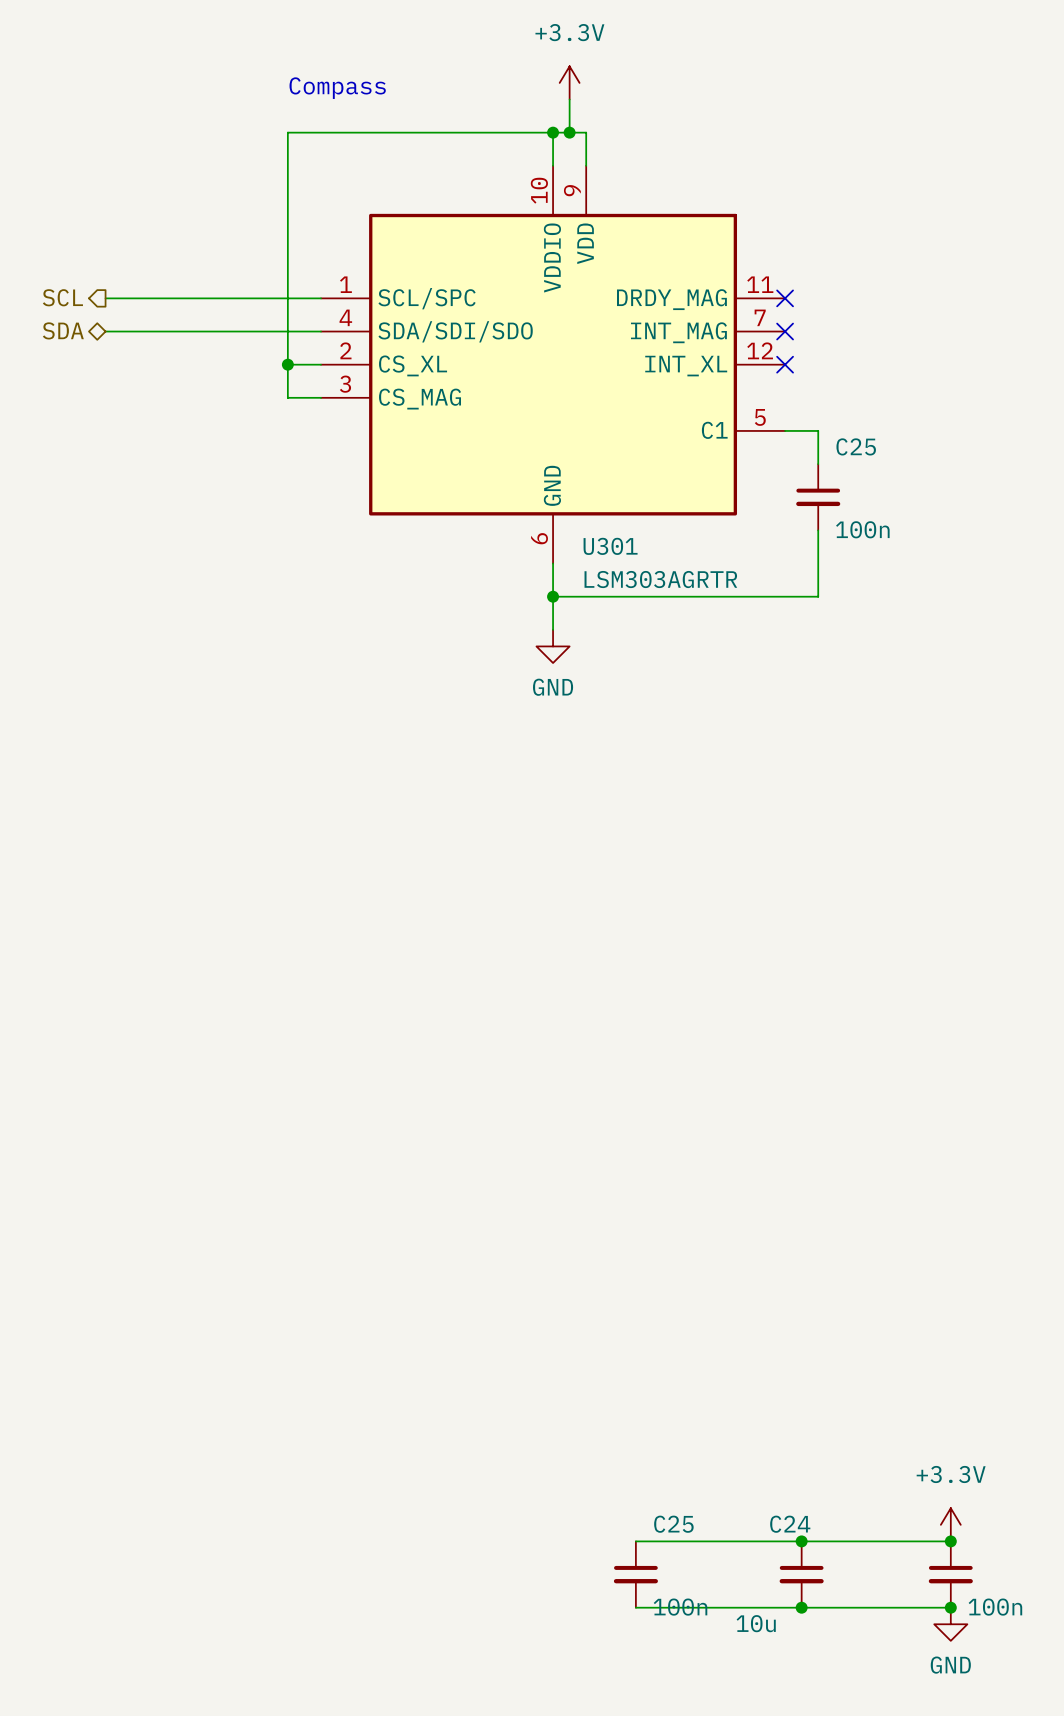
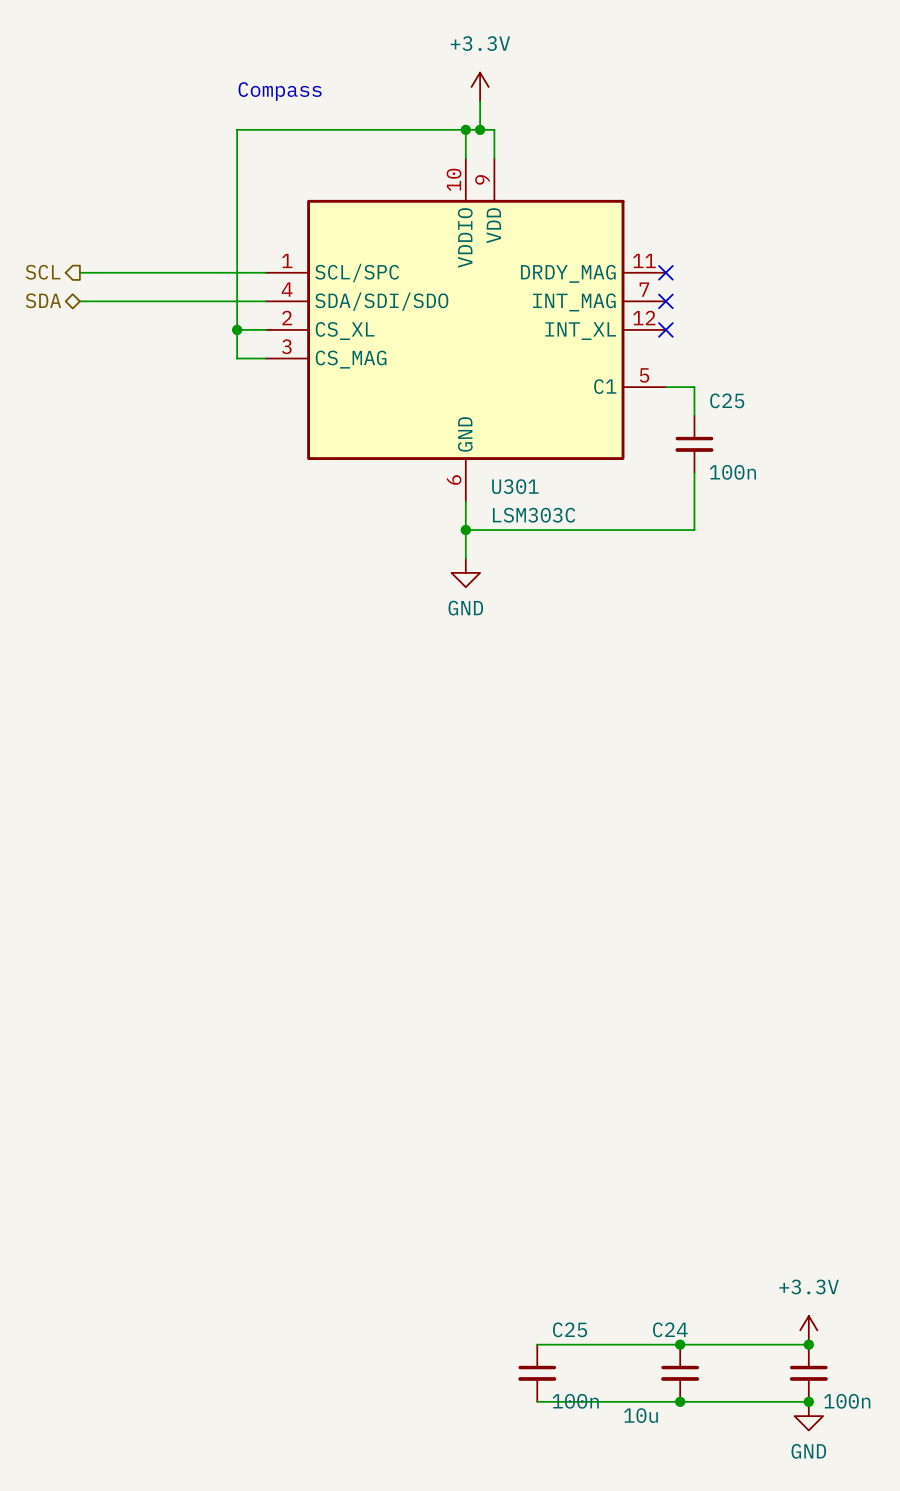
U301 value: LSM303AGRTR (660, 579) -> LSM303C (534, 515)

